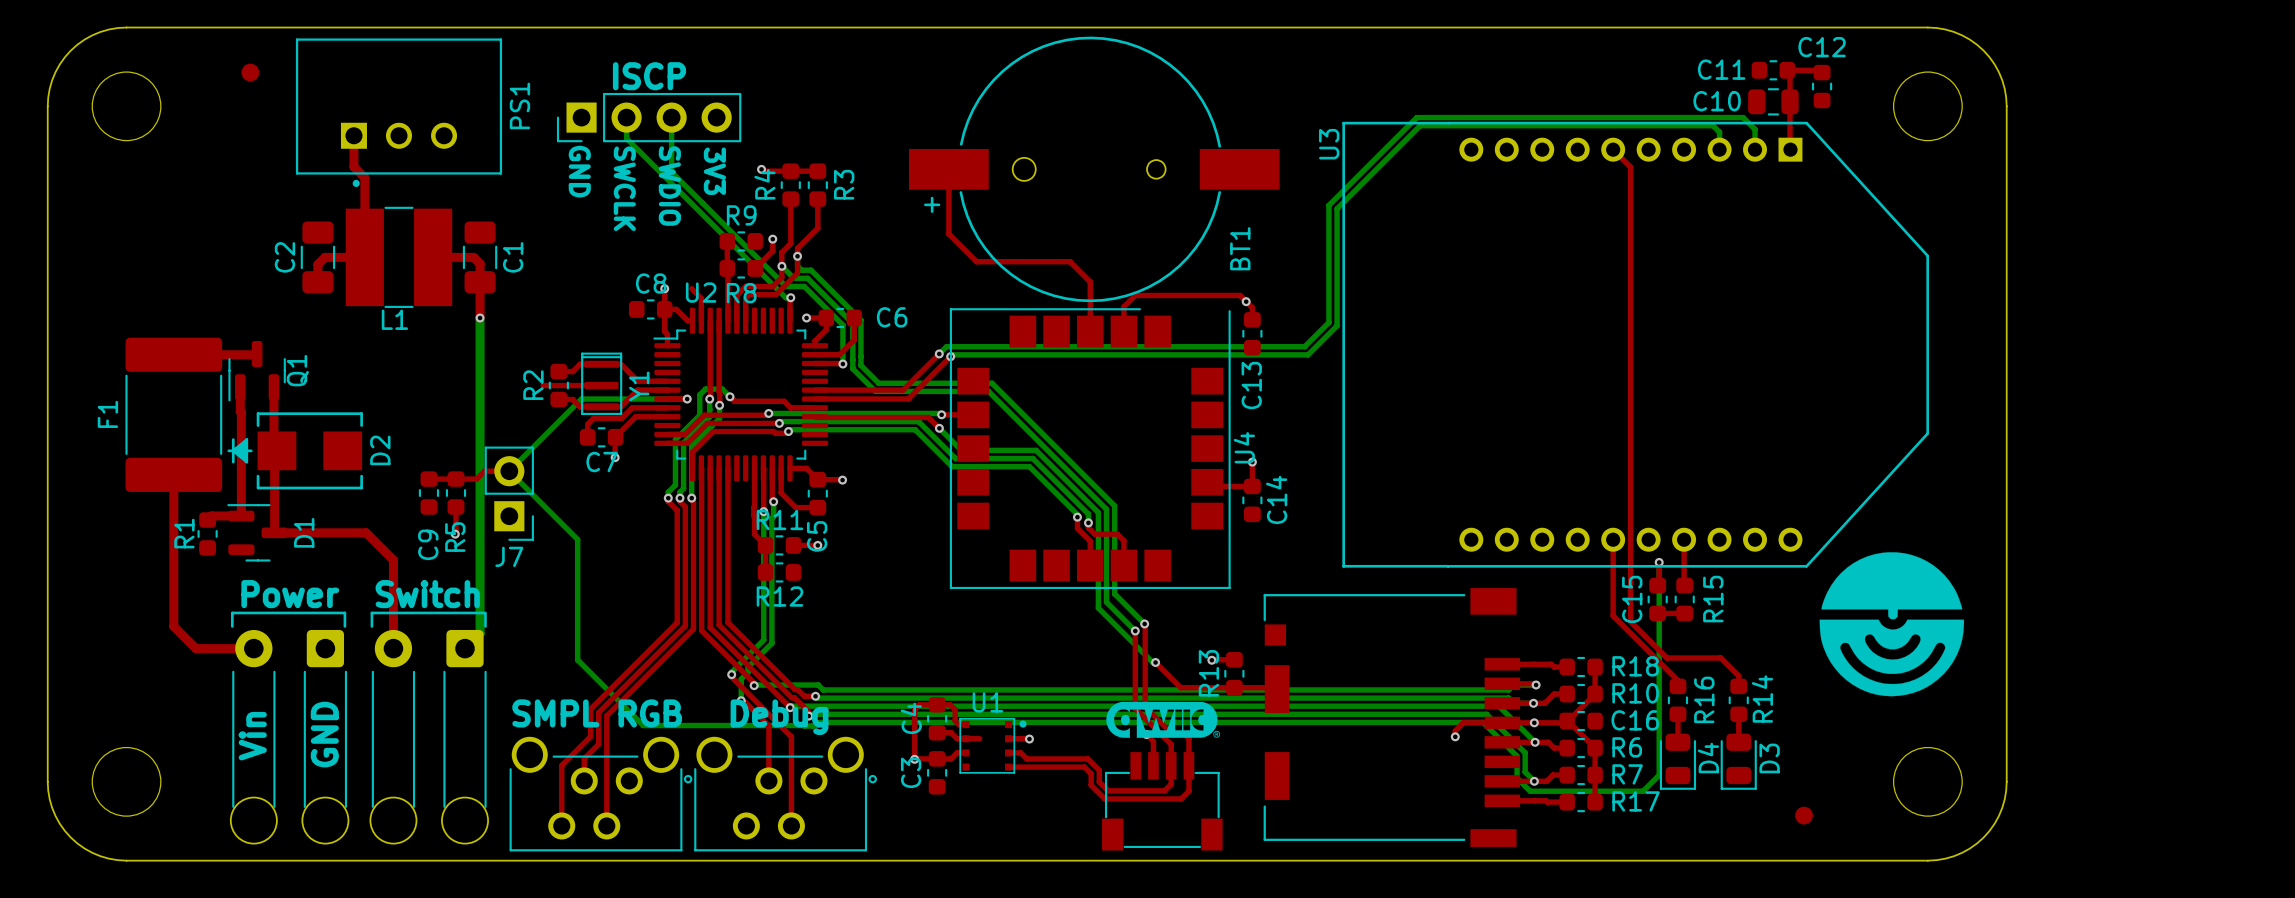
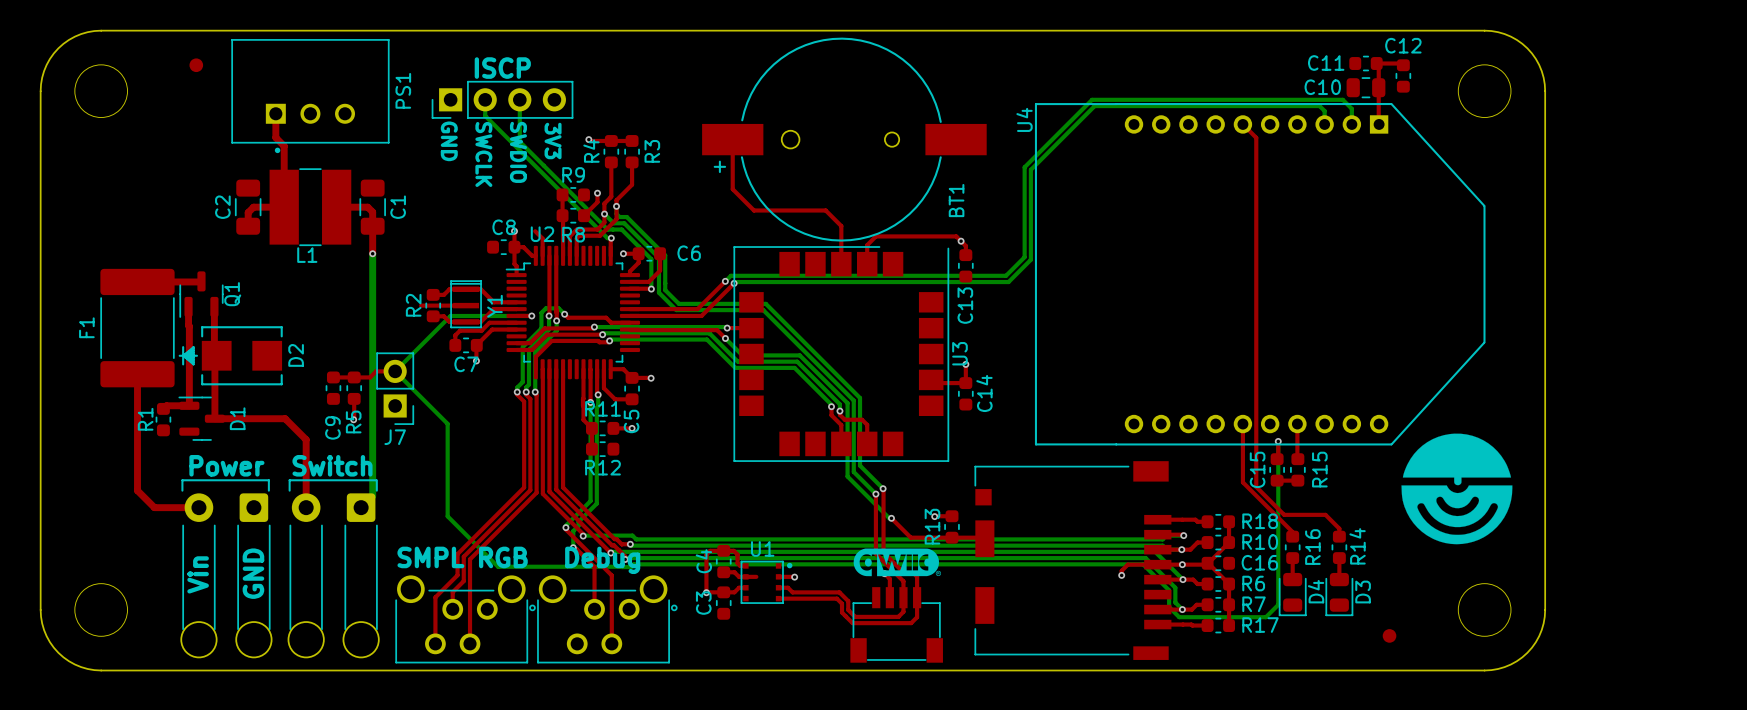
U3 name: U3 (1329, 144) -> U4 (1024, 119)
U4 name: U4 (1244, 447) -> U3 (959, 353)

